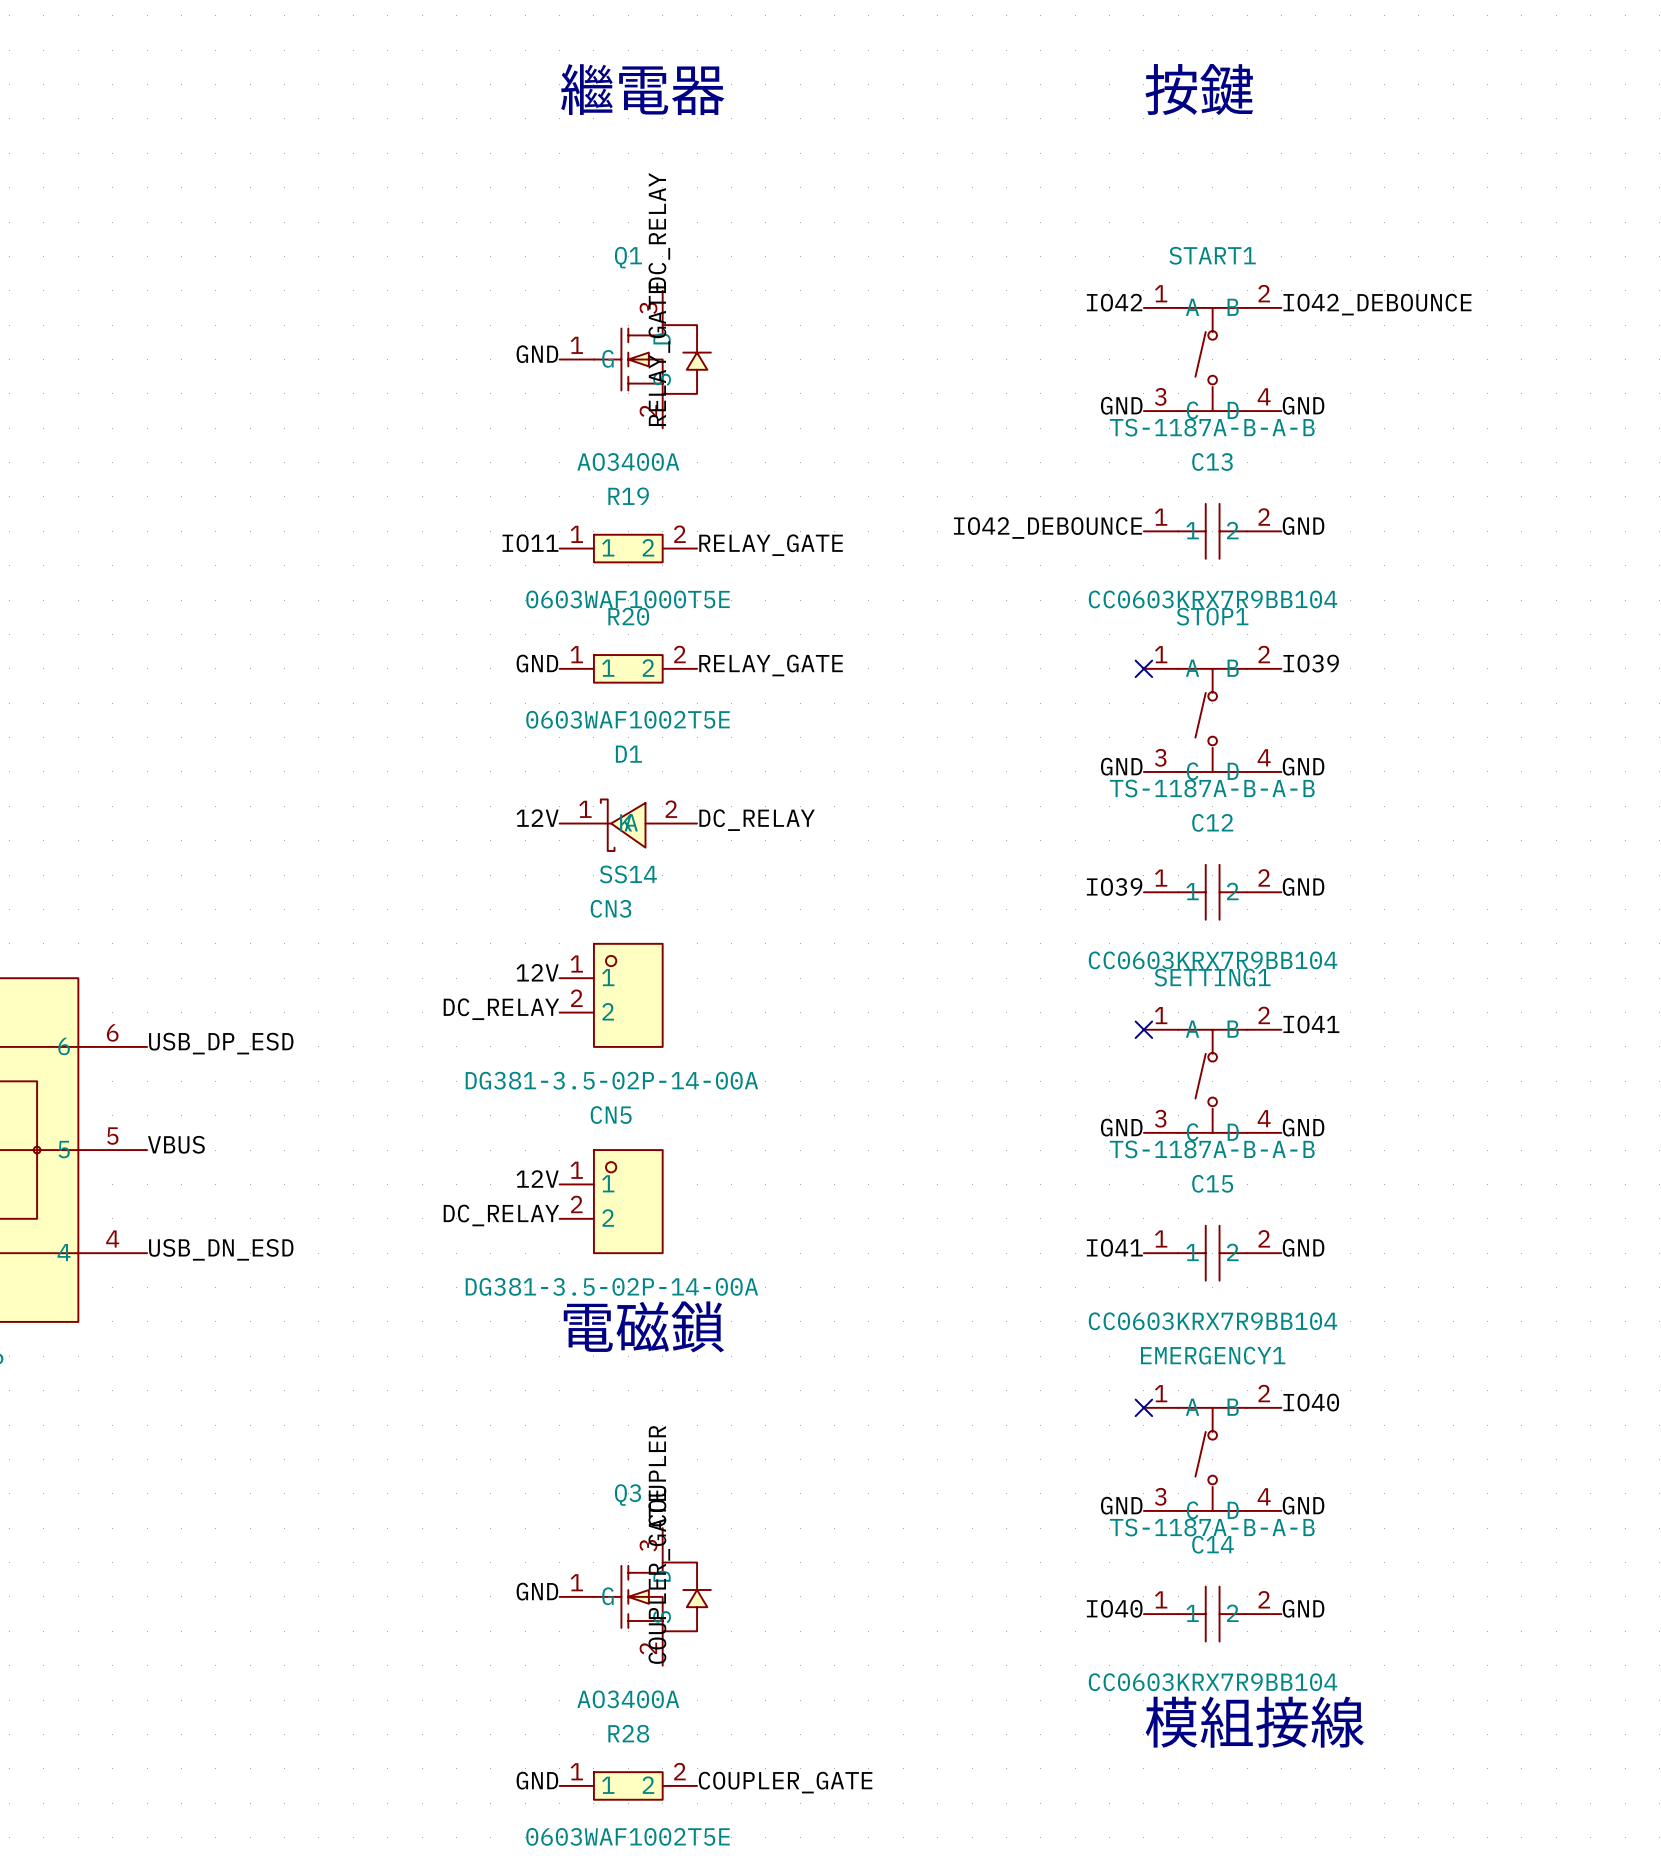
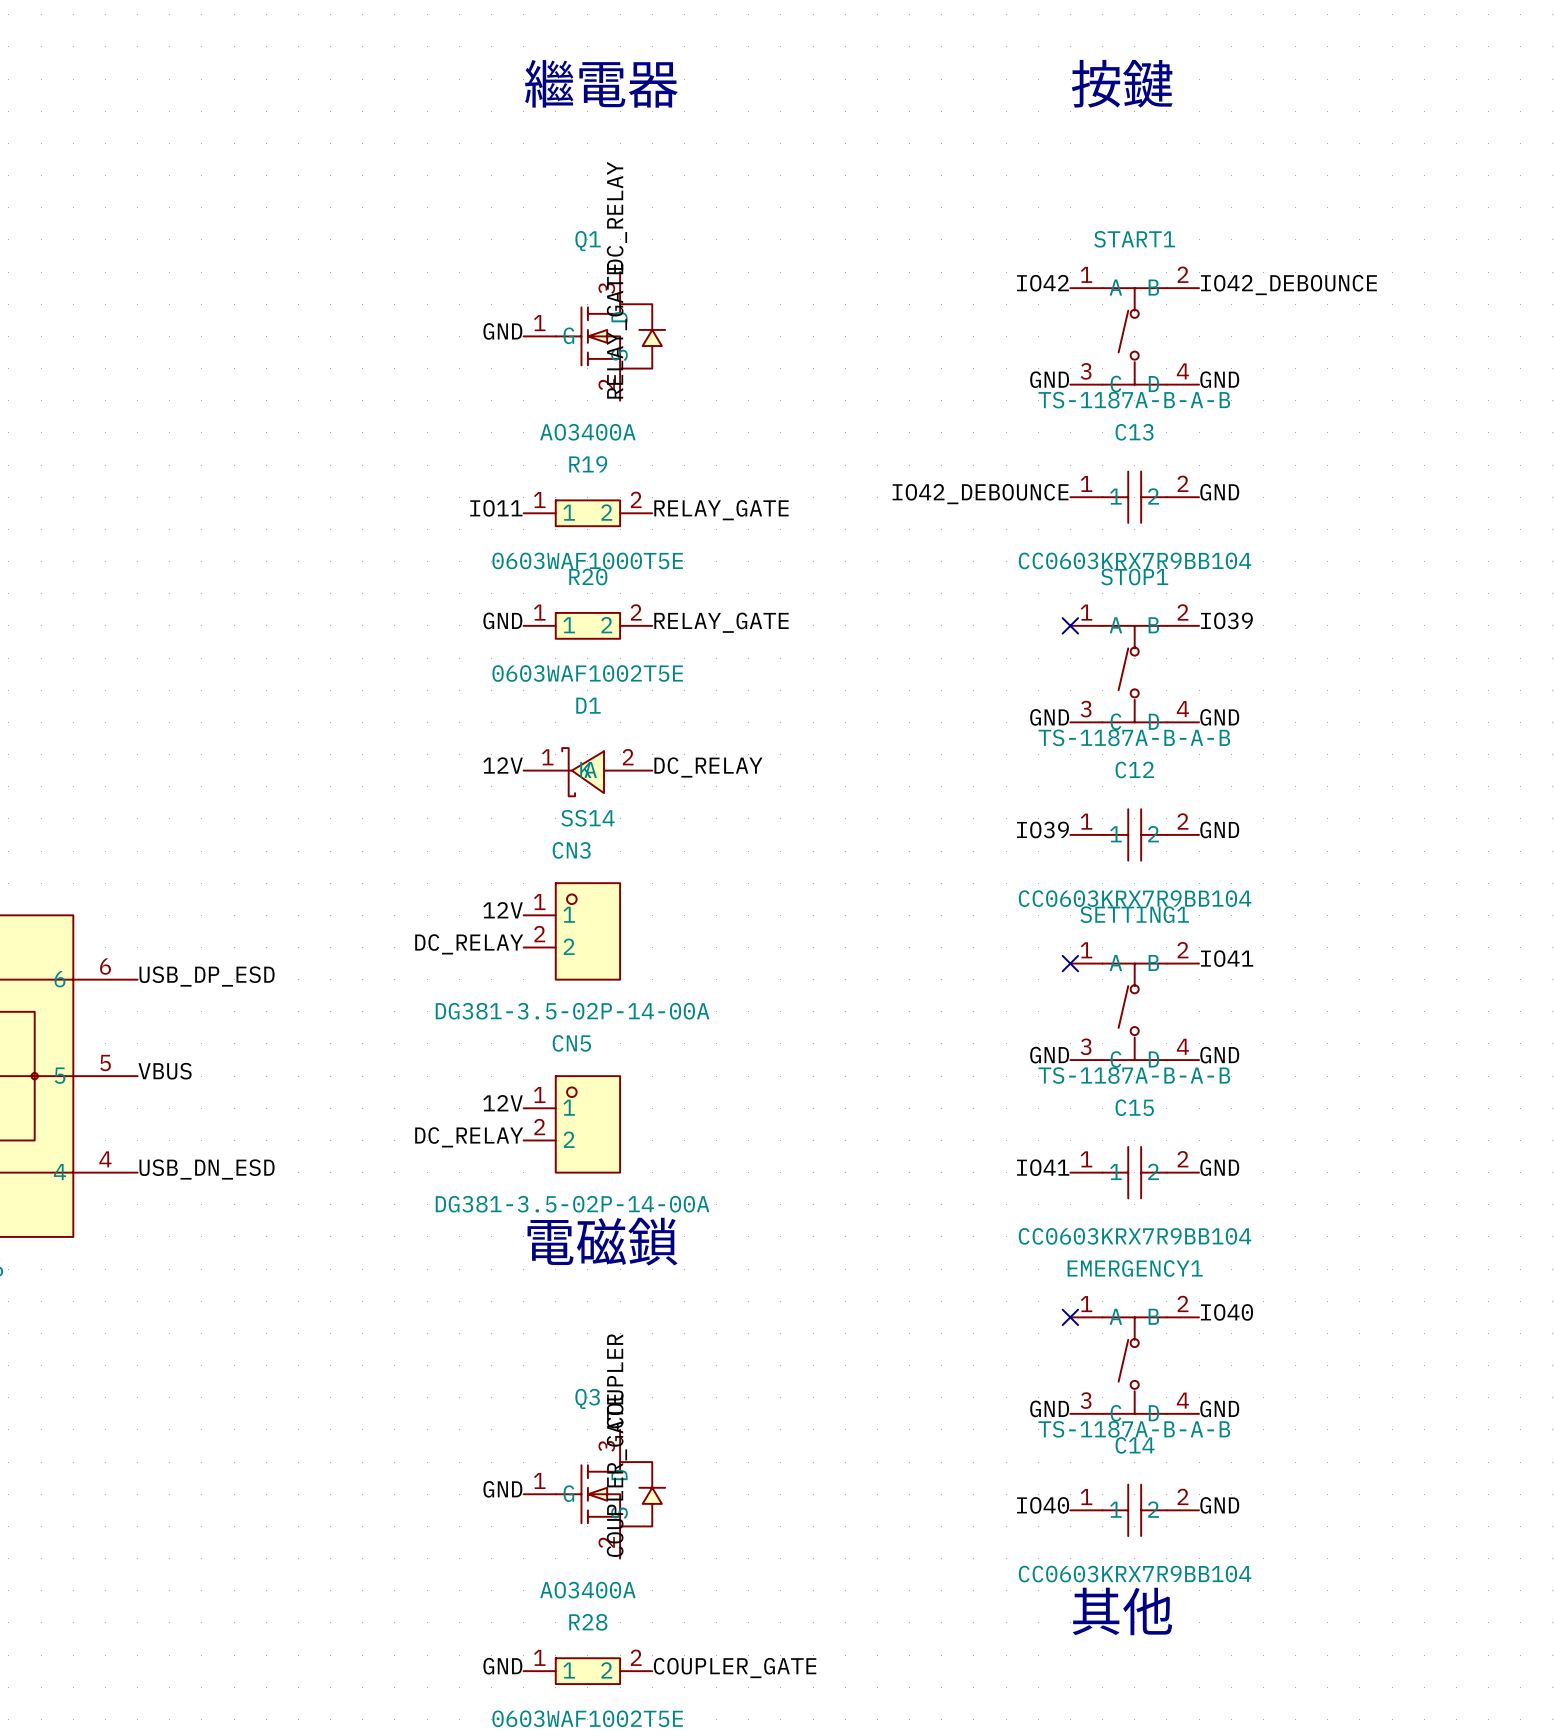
text: 模組接線 (1254, 1722) -> 其他 (1122, 1611)

